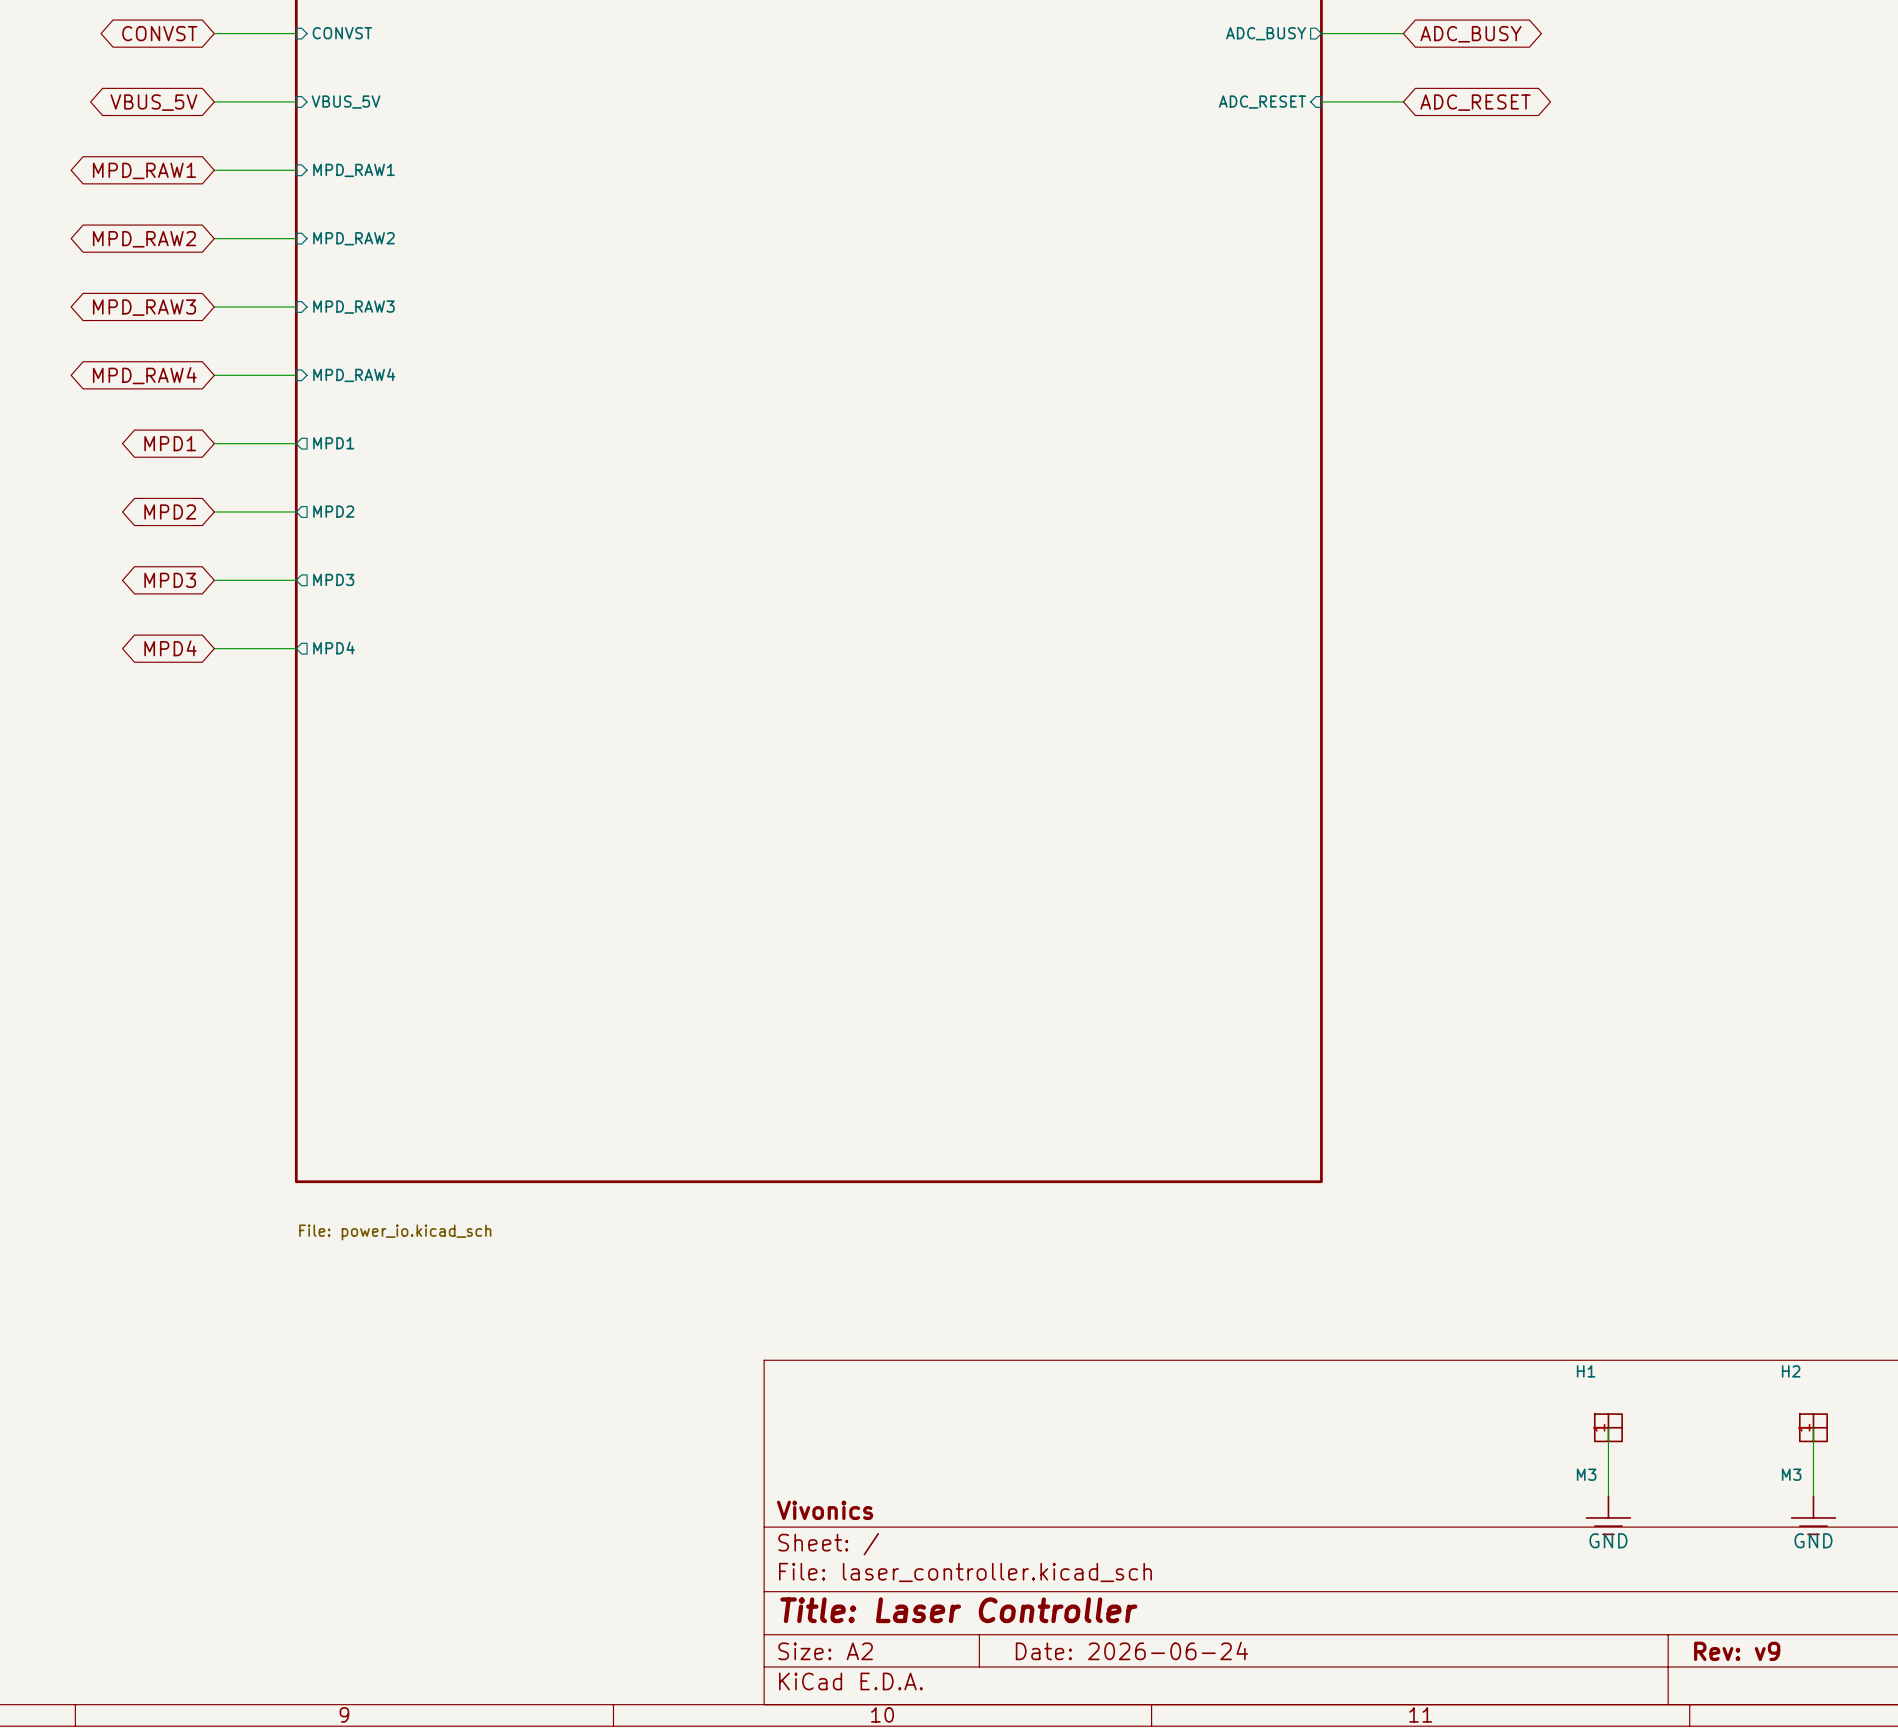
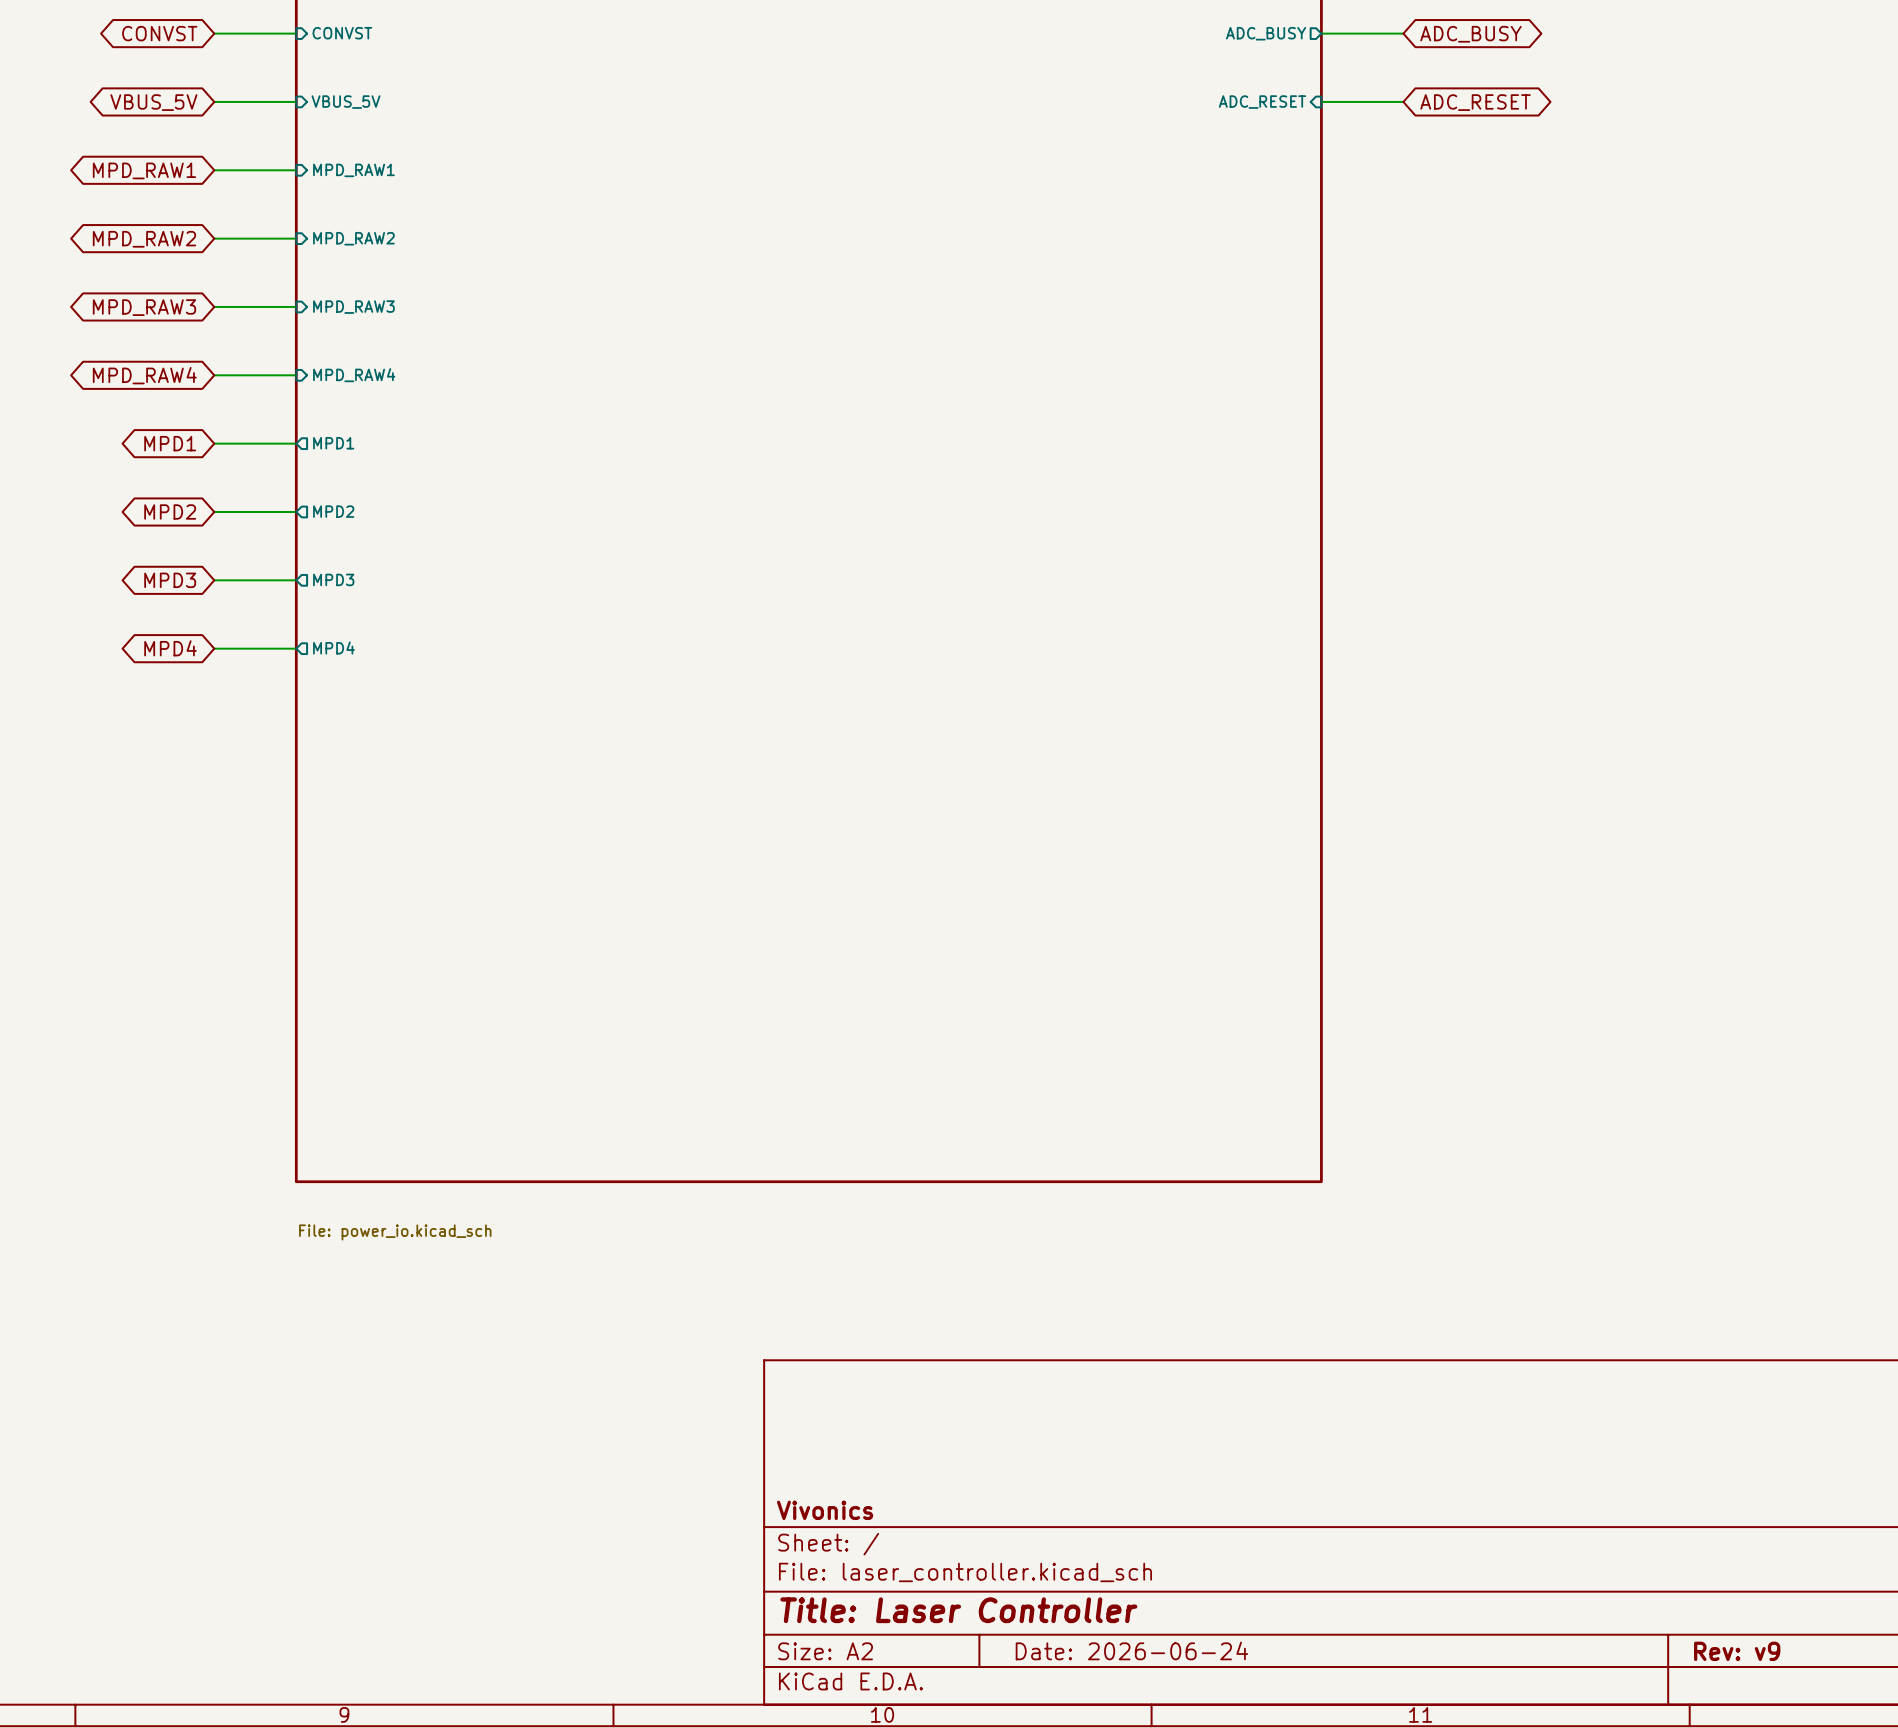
wire: (1608, 1427) (1608, 1496) -> none
H1: M3 (1608, 1427) -> none
wire: (1813, 1427) (1813, 1496) -> none
H2: M3 (1813, 1427) -> none
power symbol: GND (1608, 1515) -> none
power symbol: GND (1813, 1515) -> none

